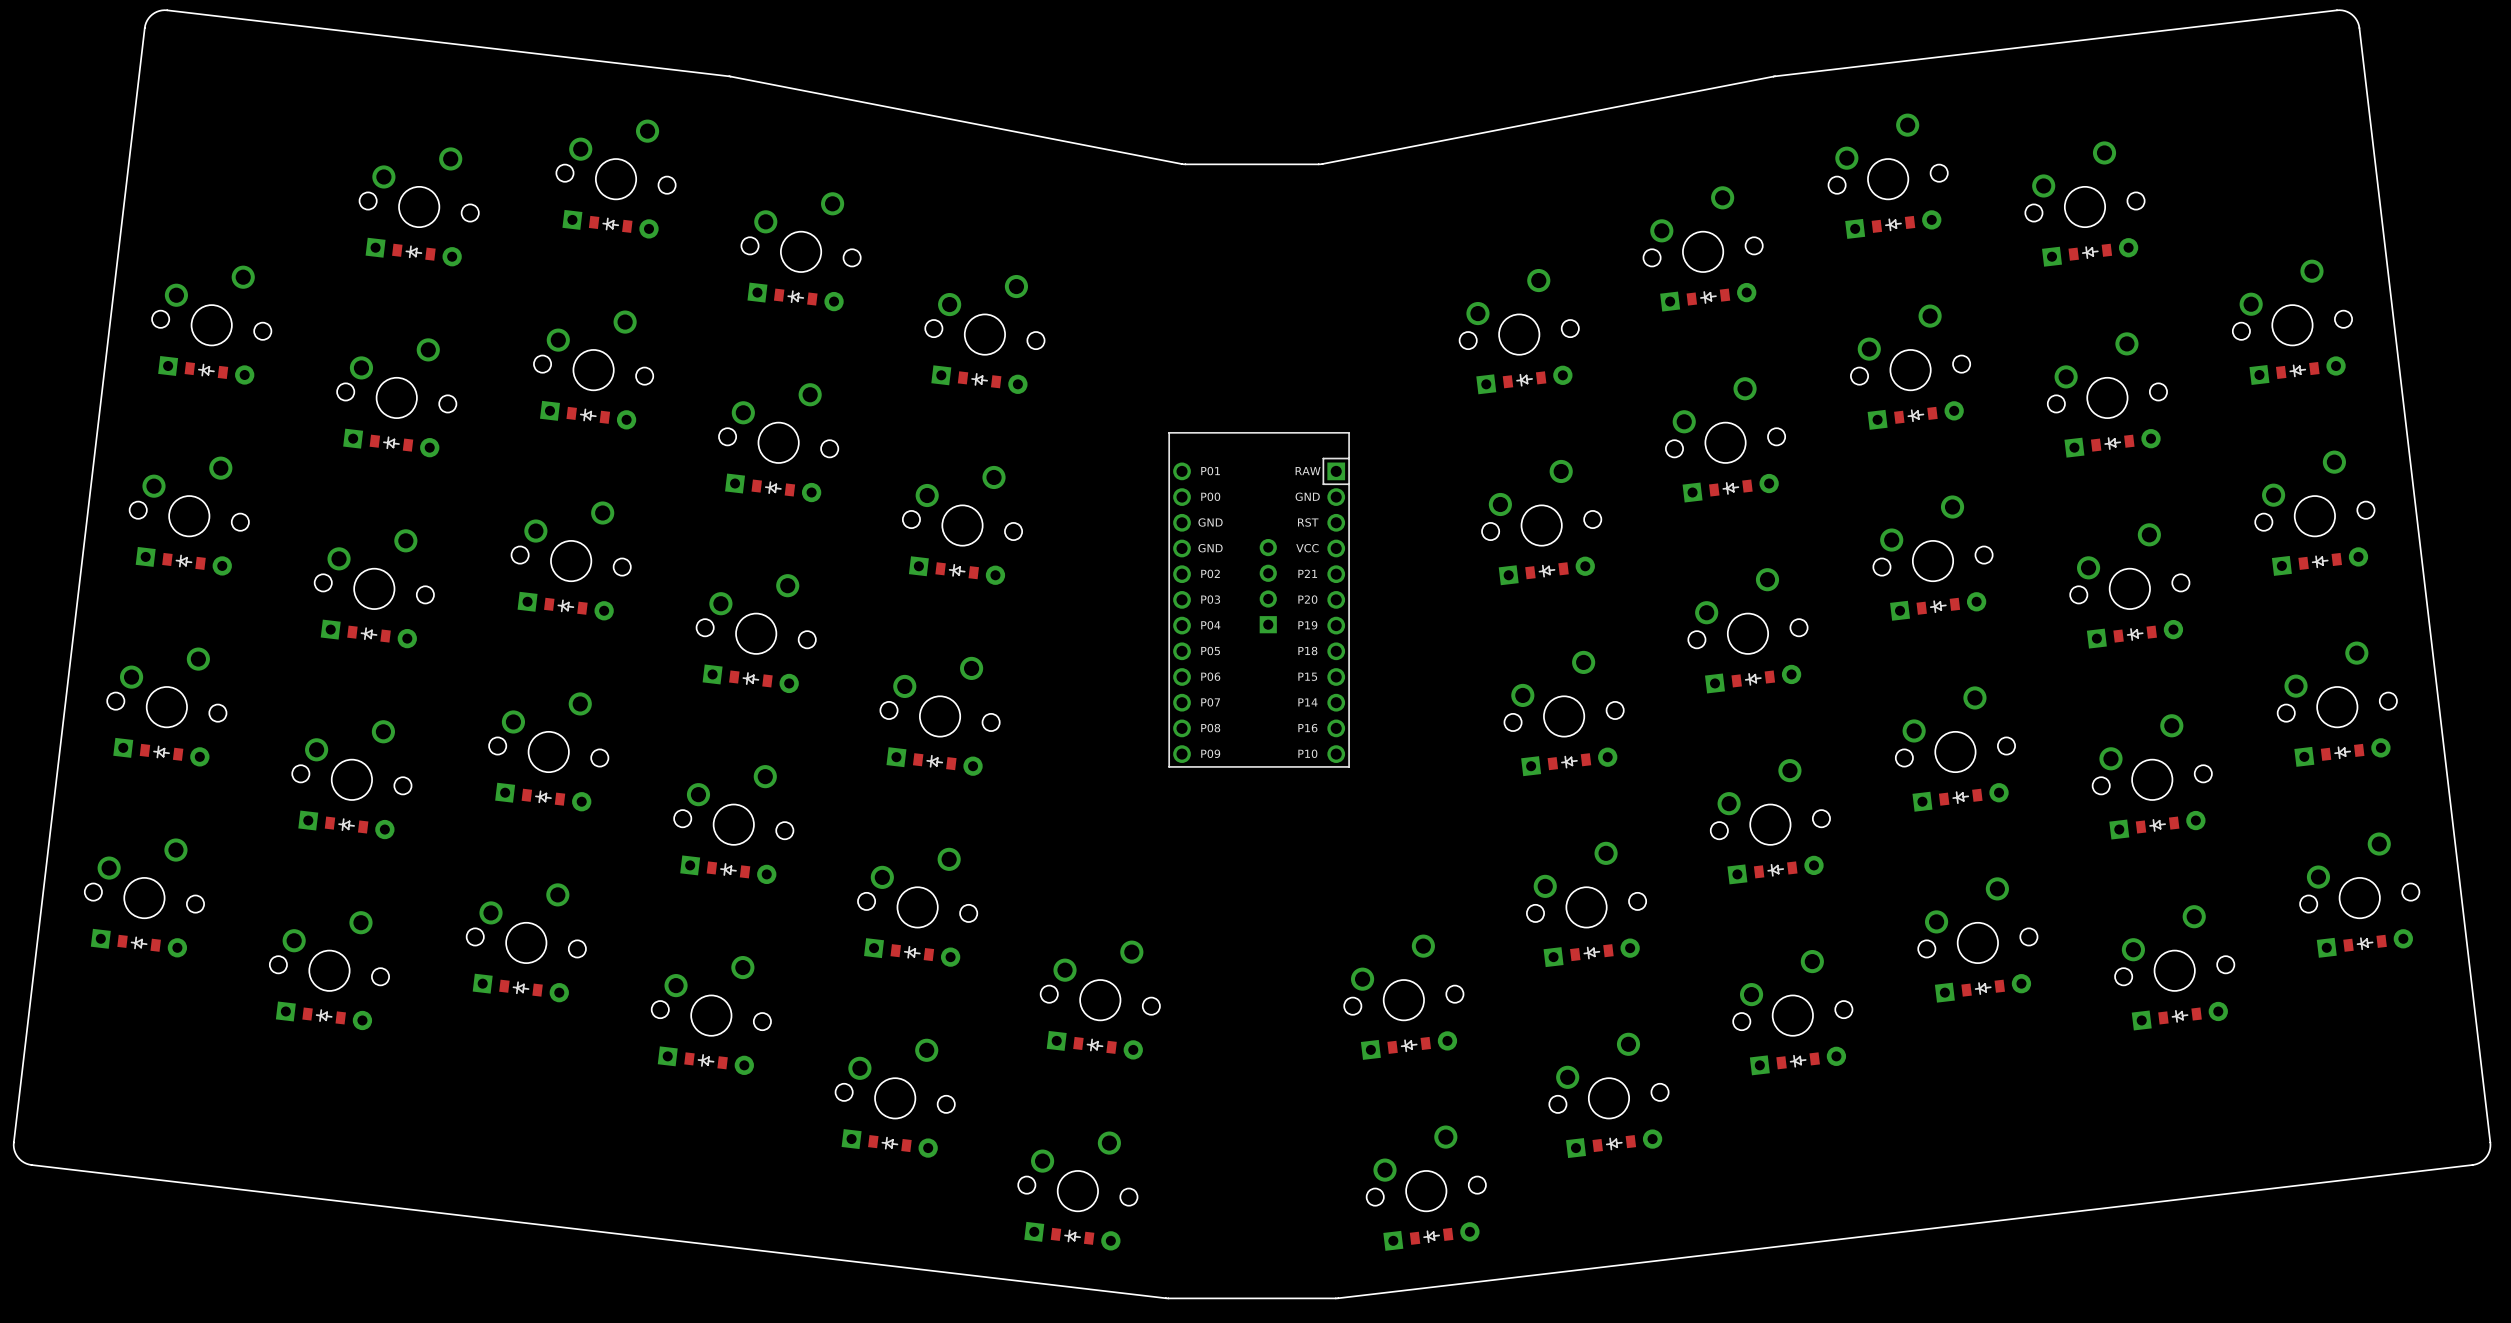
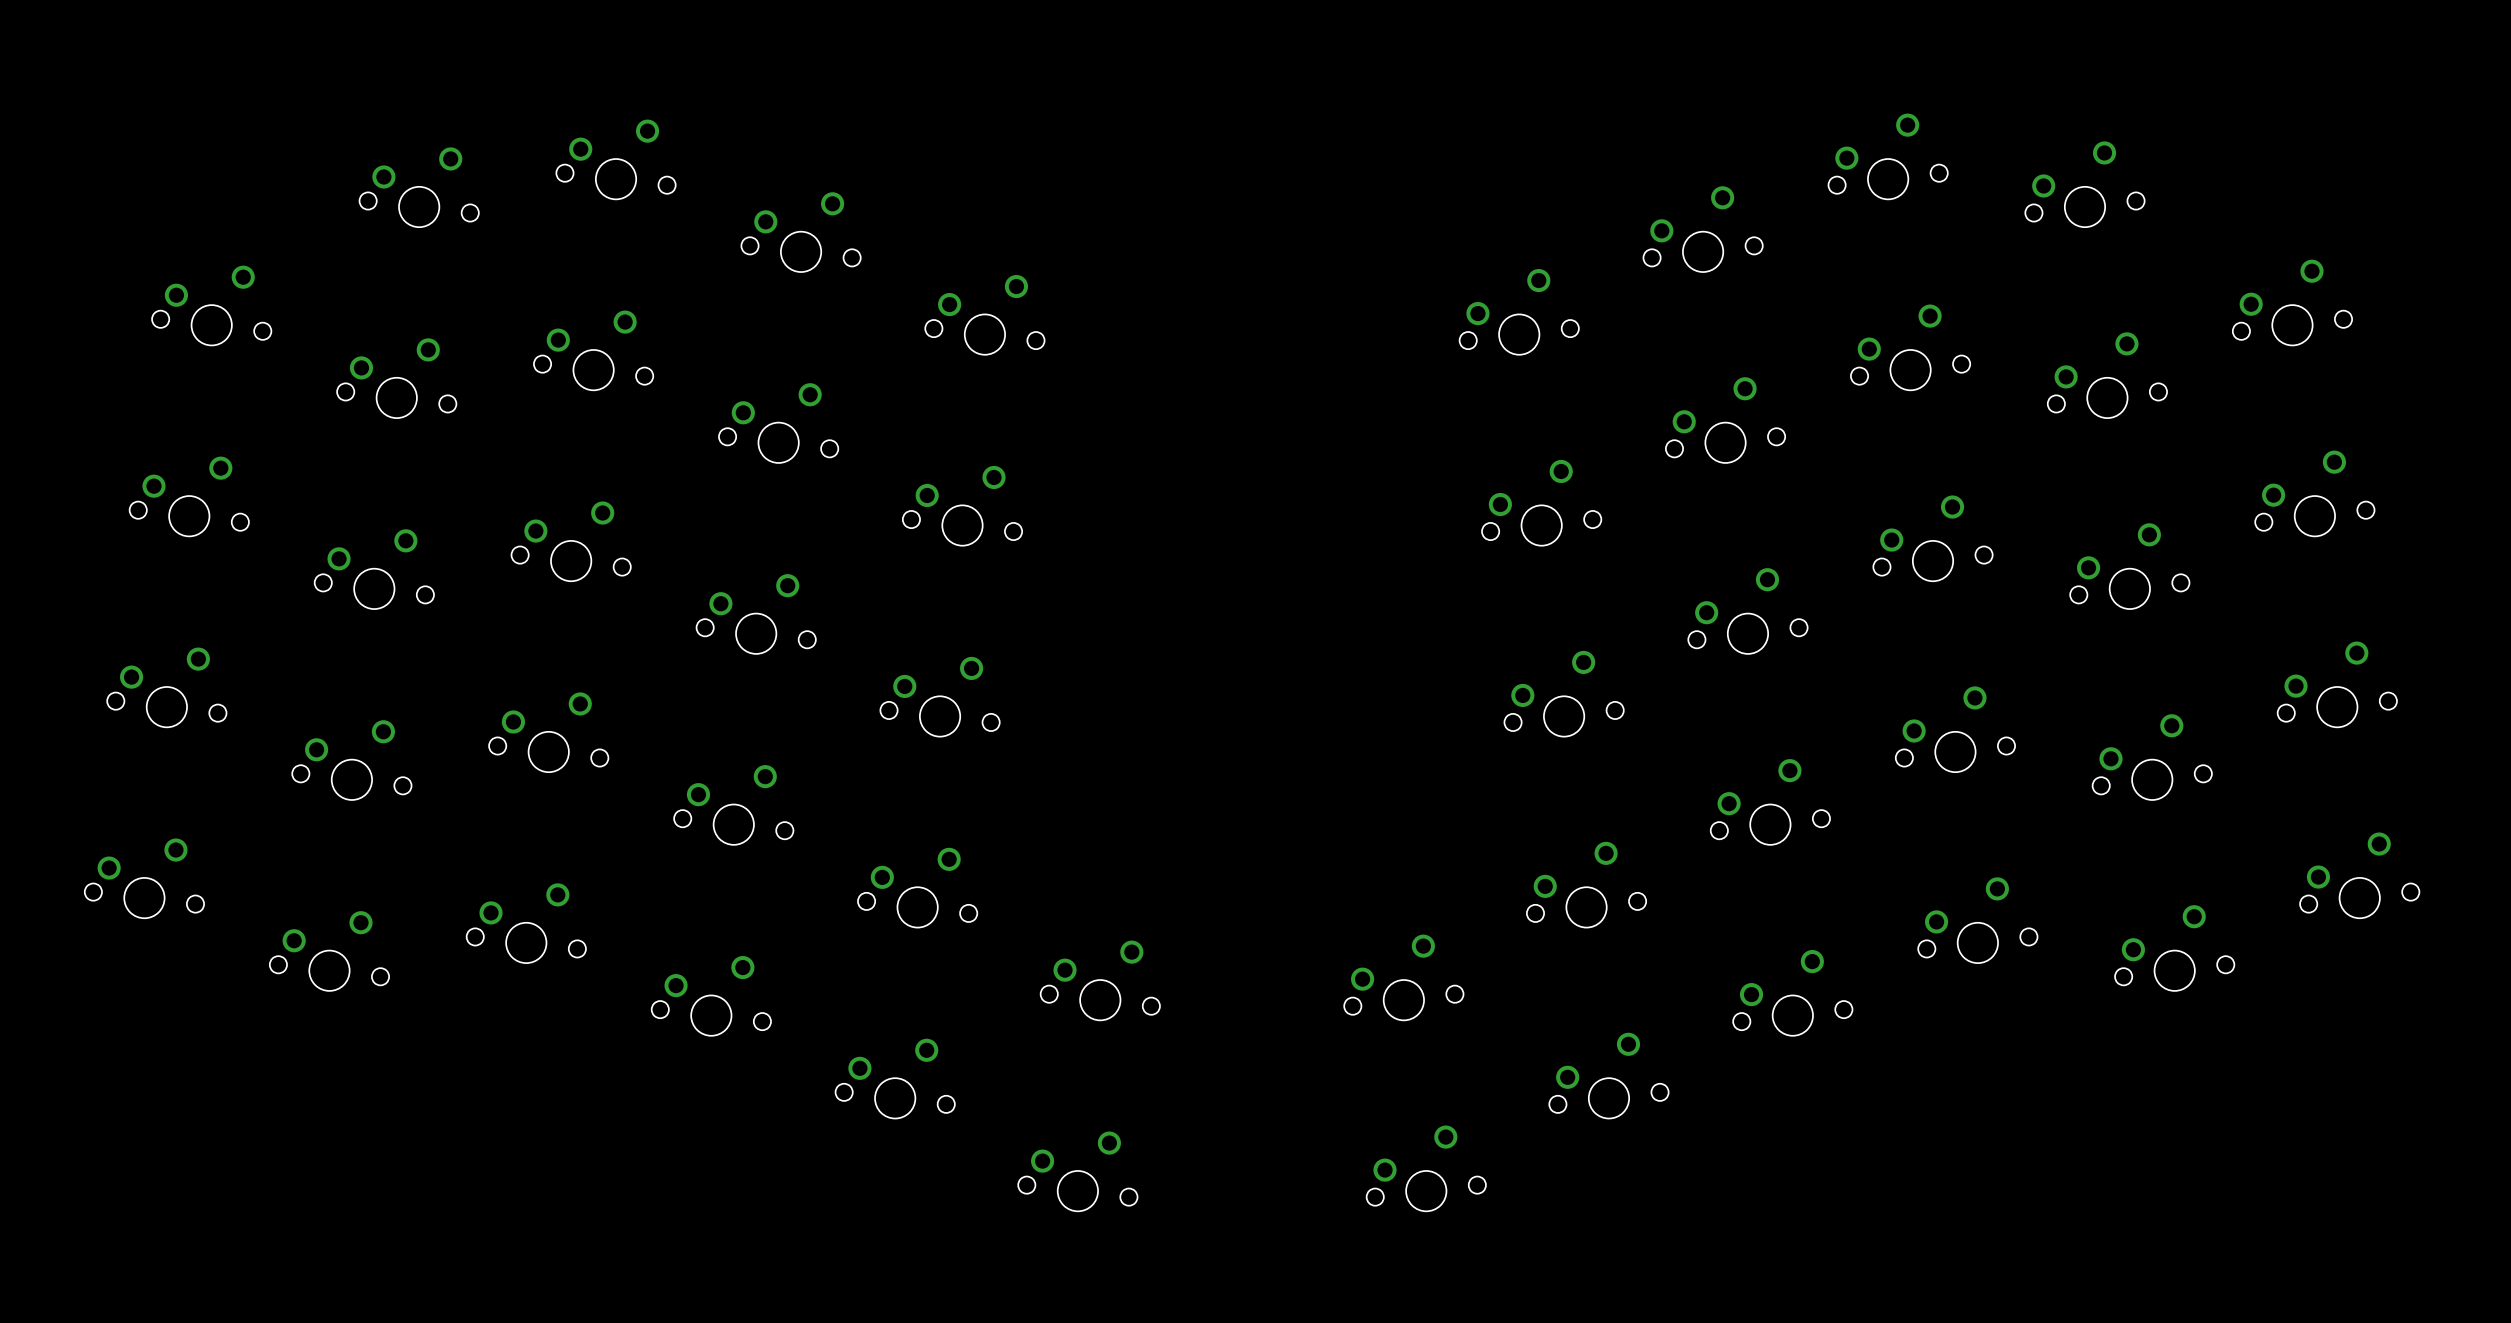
board edge: (167, 10) (729, 76) (1185, 164) (1320, 164) (1774, 76) (2336, 10) (2347, 11) (2355, 18) (2359, 28) (2490, 1142) (2488, 1153) (2481, 1161) (2472, 1165) (1335, 1298) (1165, 1298) (31, 1165) (24, 1162) (15, 1152) (13, 1142) (144, 28) (147, 20) (152, 14) (159, 10) (167, 10) -> none
part: (610, 224) -> none
part: (1893, 224) -> none
part: (413, 252) -> none
part: (2090, 252) -> none
part: (795, 296) -> none
part: (1708, 297) -> none
part: (206, 370) -> none
part: (2297, 370) -> none
part: (979, 379) -> none
part: (1524, 379) -> none
part: (588, 415) -> none
part: (1915, 415) -> none
part: (391, 442) -> none
part: (2112, 443) -> none
part: (773, 487) -> none
part: (1730, 488) -> none
part: (183, 561) -> none
part: (2320, 561) -> none
part: (957, 570) -> none
part: (1546, 570) -> none
part: (1268, 586) -> none
part: (1259, 599) -> none
part: (565, 606) -> none
part: (1938, 606) -> none
part: (368, 633) -> none
part: (2134, 634) -> none
part: (750, 678) -> none
part: (1753, 679) -> none
part: (161, 752) -> none
part: (2342, 752) -> none
part: (934, 761) -> none
part: (1569, 761) -> none
part: (543, 797) -> none
part: (1960, 797) -> none
part: (346, 824) -> none
part: (2157, 825) -> none
part: (728, 869) -> none
part: (1775, 870) -> none
part: (138, 943) -> none
part: (2364, 943) -> none
part: (912, 952) -> none
part: (1591, 952) -> none
part: (520, 987) -> none
part: (1983, 988) -> none
part: (323, 1015) -> none
part: (2179, 1016) -> none
part: (1094, 1045) -> none
part: (1409, 1045) -> none
part: (705, 1060) -> none
part: (1797, 1061) -> none
part: (889, 1143) -> none
part: (1614, 1143) -> none
part: (1072, 1236) -> none
part: (1431, 1236) -> none

